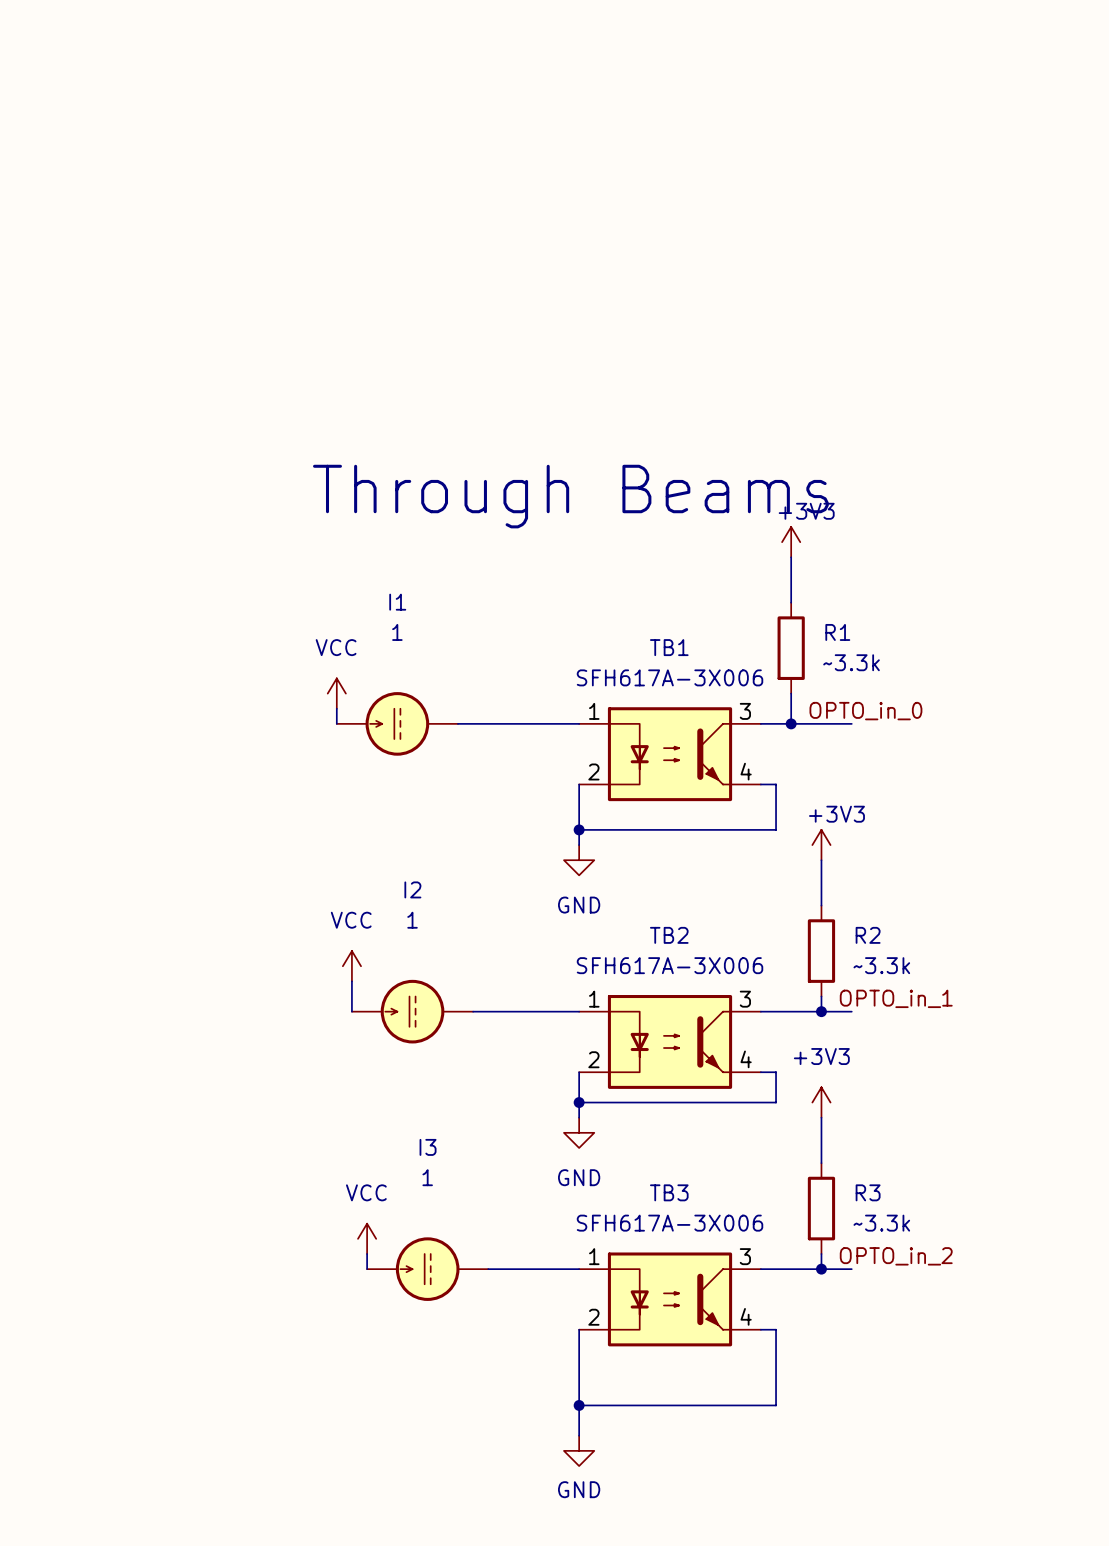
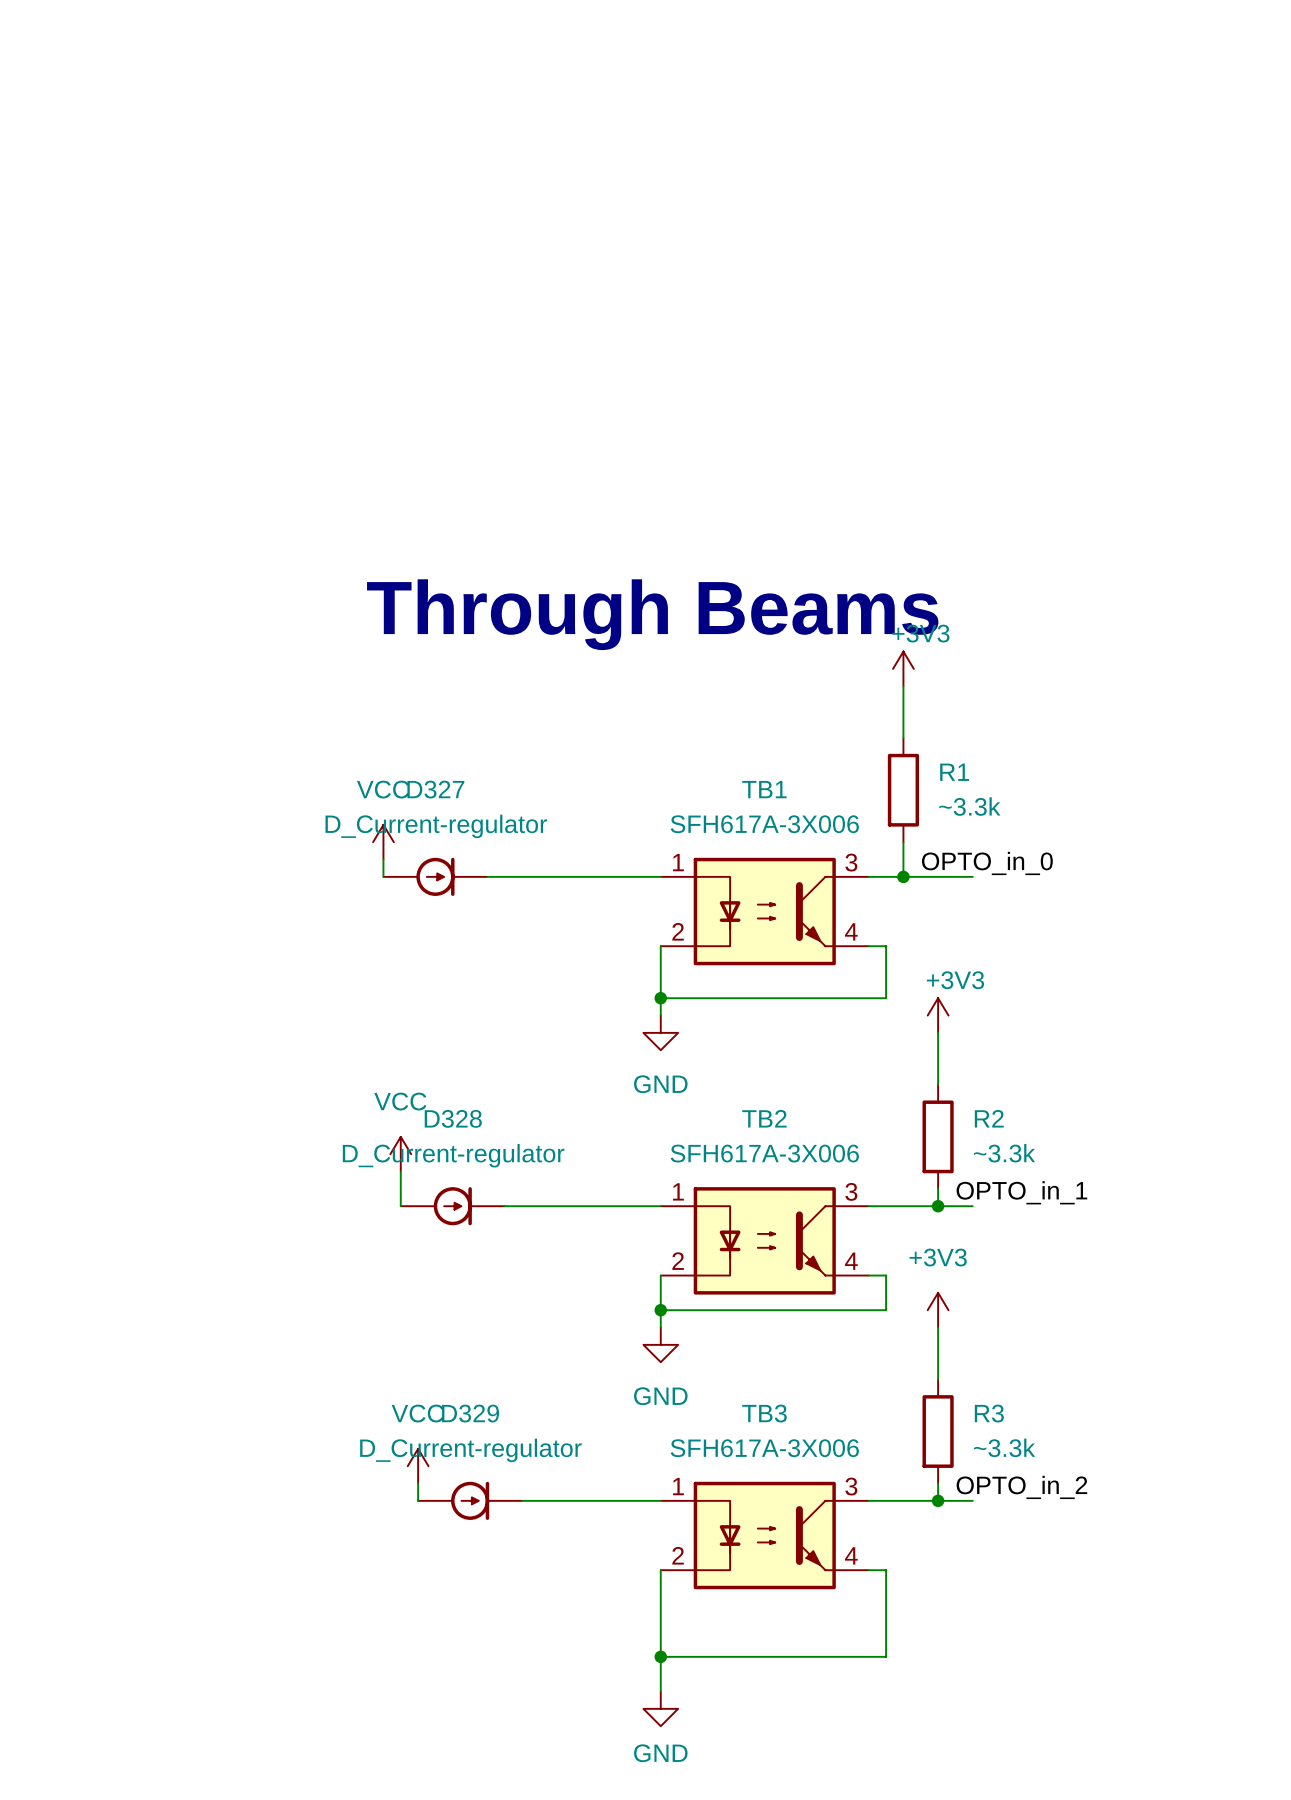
D327: none -> D_Current-regulator (435, 876)
I1: 1 (397, 723) -> none
D328: none -> D_Current-regulator (452, 1206)
I2: 1 (412, 1011) -> none
D329: none -> D_Current-regulator (470, 1500)
I3: 1 (427, 1269) -> none

